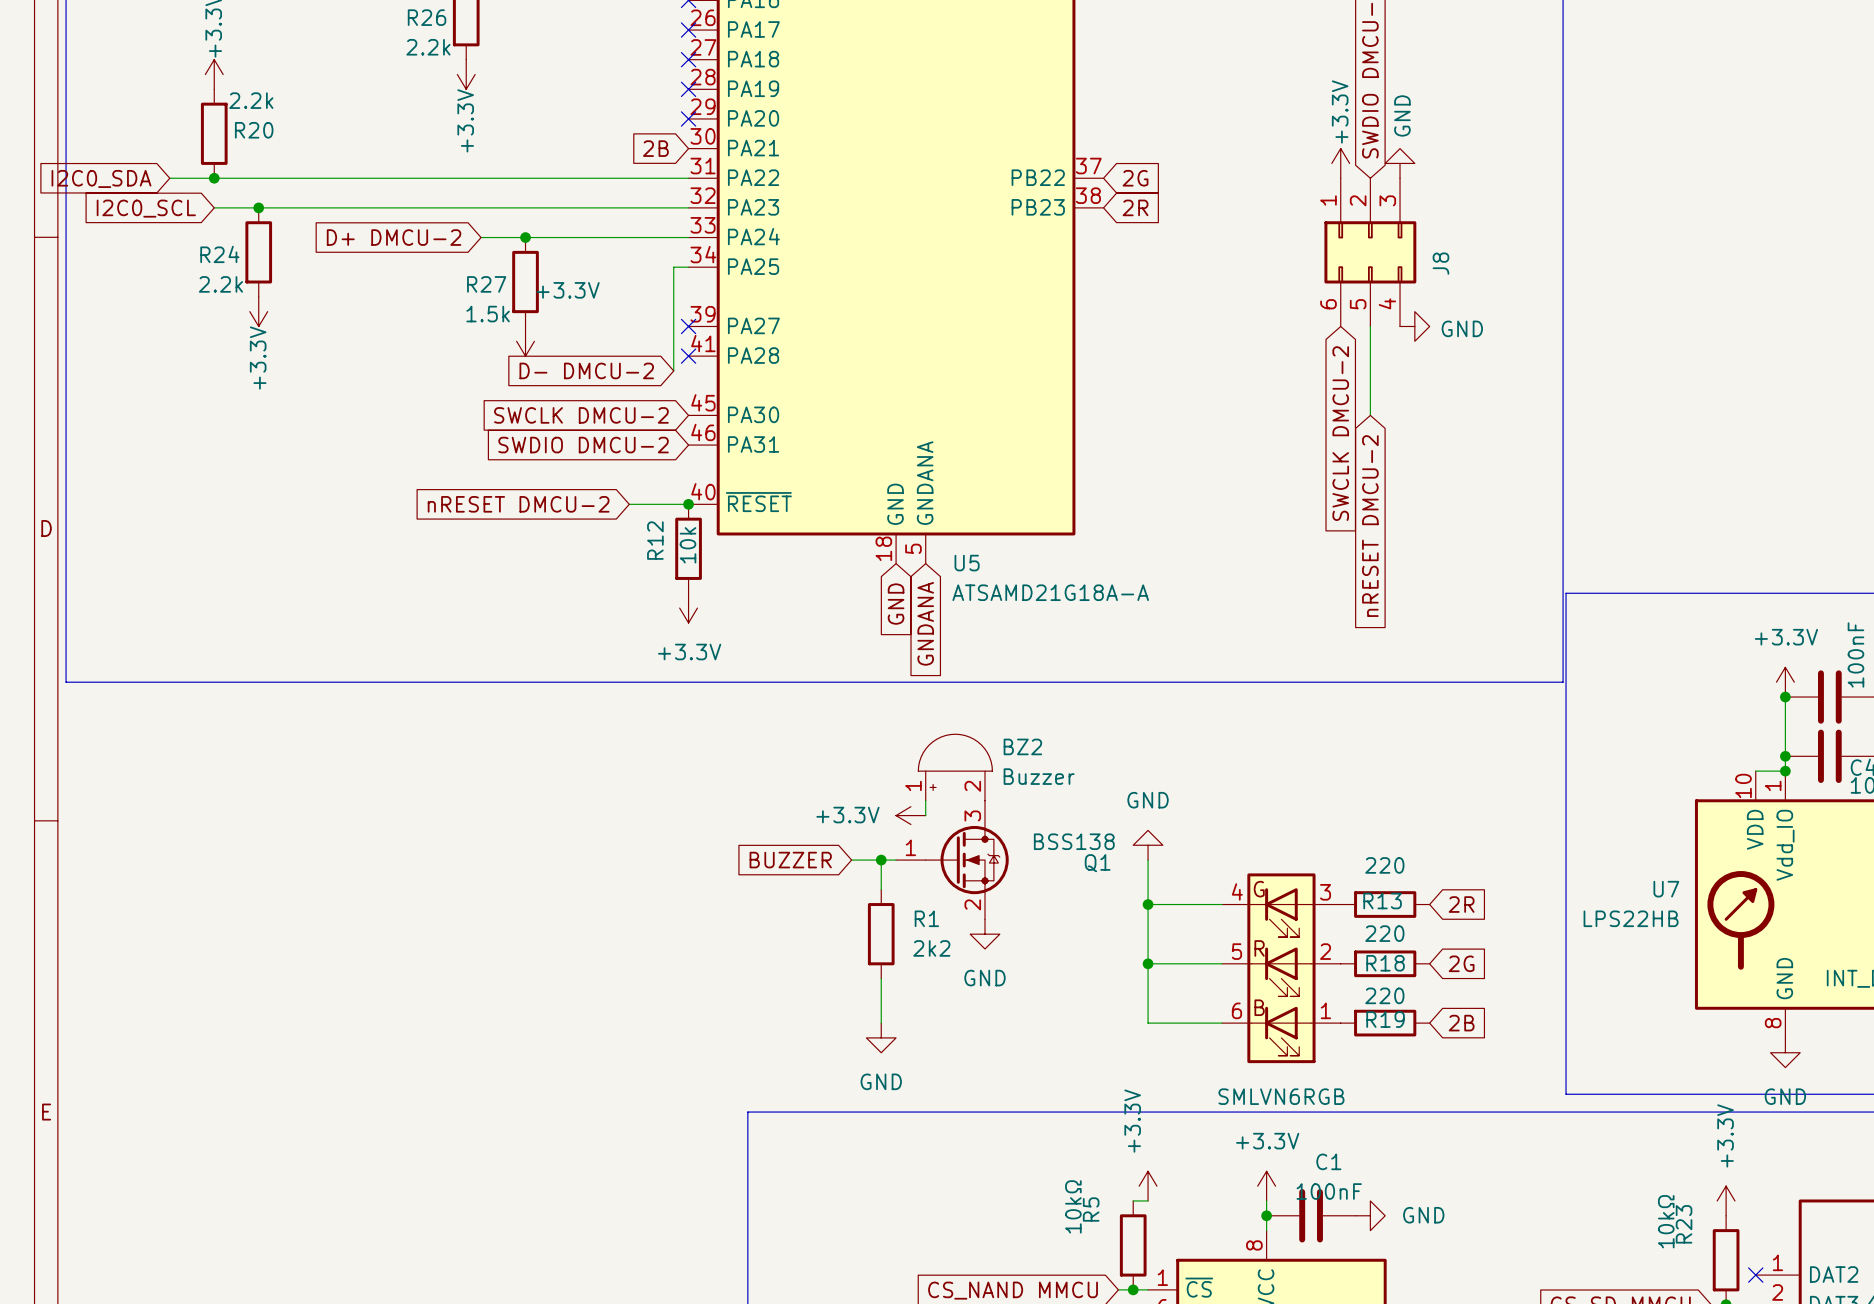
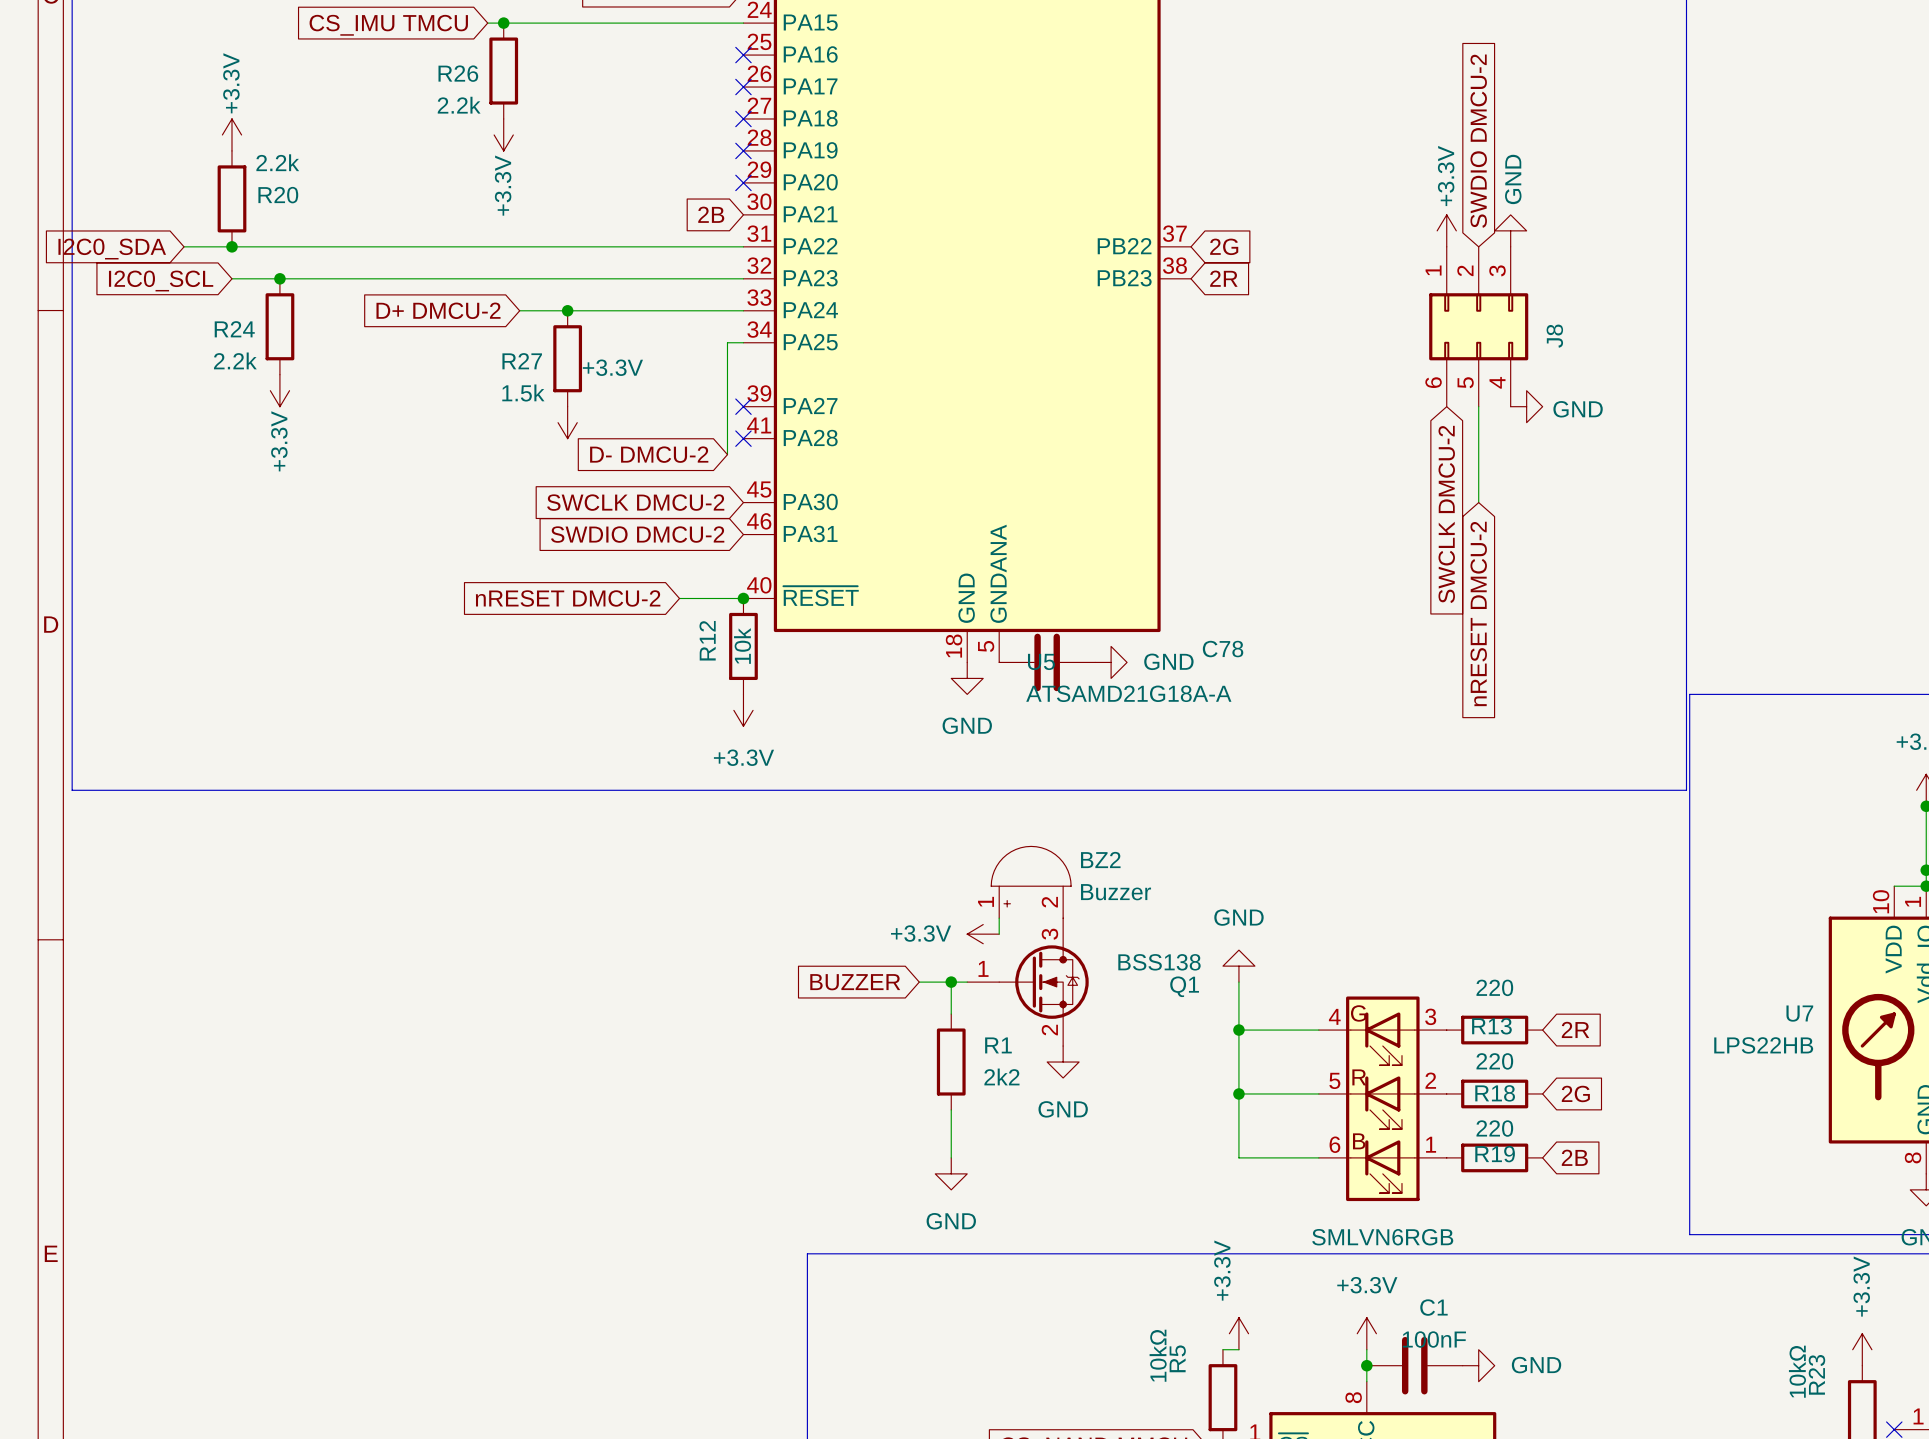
C78: none -> (1047, 662)
power symbol: none -> GND (1111, 662)
power symbol: none -> GND (967, 678)
global label: GND (896, 604) -> none
global label: GNDANA (925, 623) -> none

